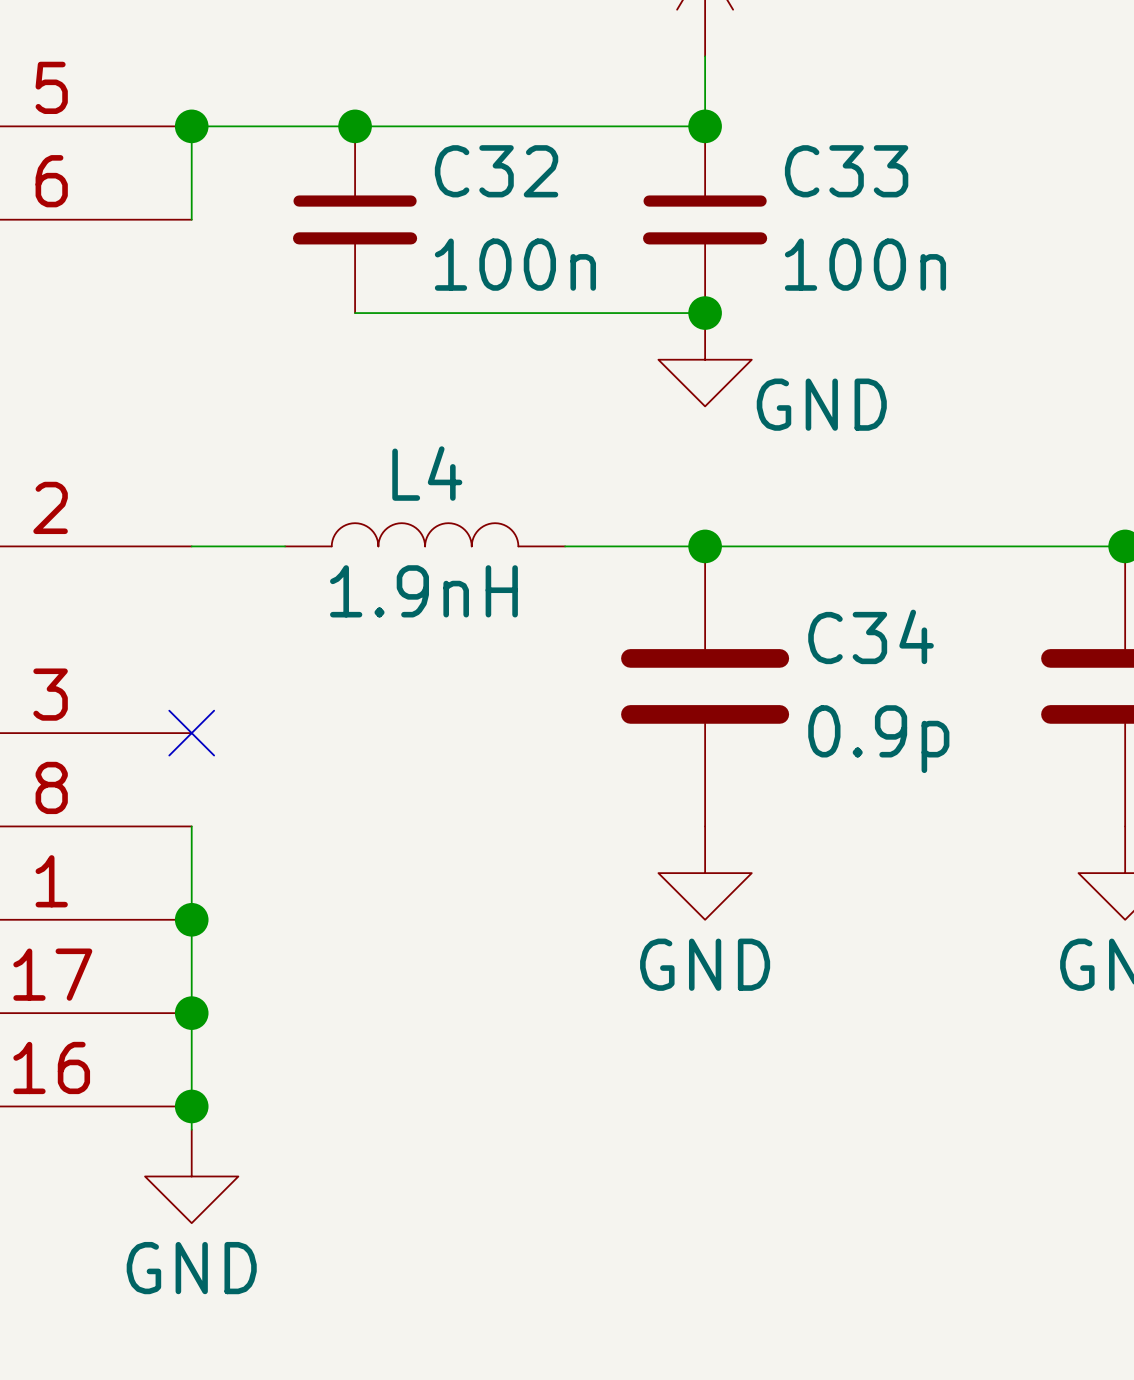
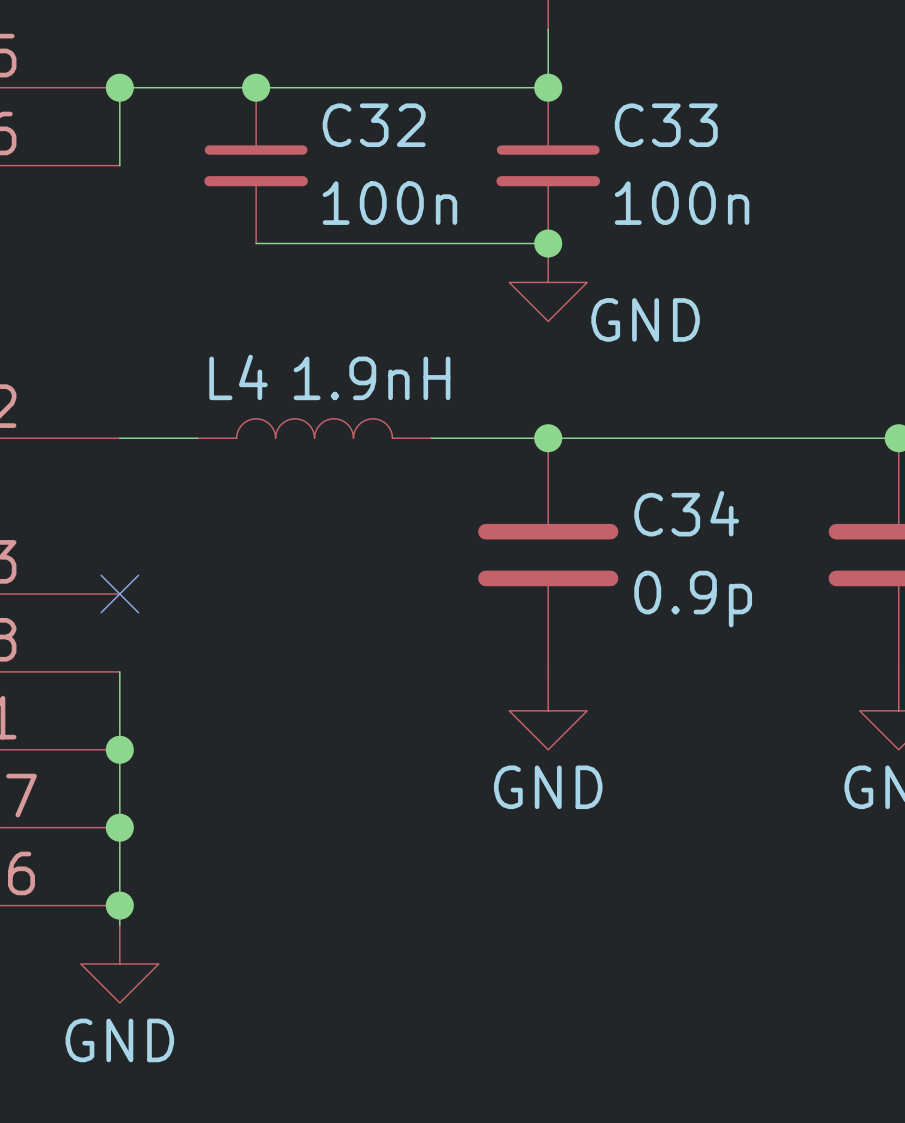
L4 name position: L4 (427, 473) -> L4 (238, 377)
L4 value position: 1.9nH (423, 591) -> 1.9nH (372, 378)

